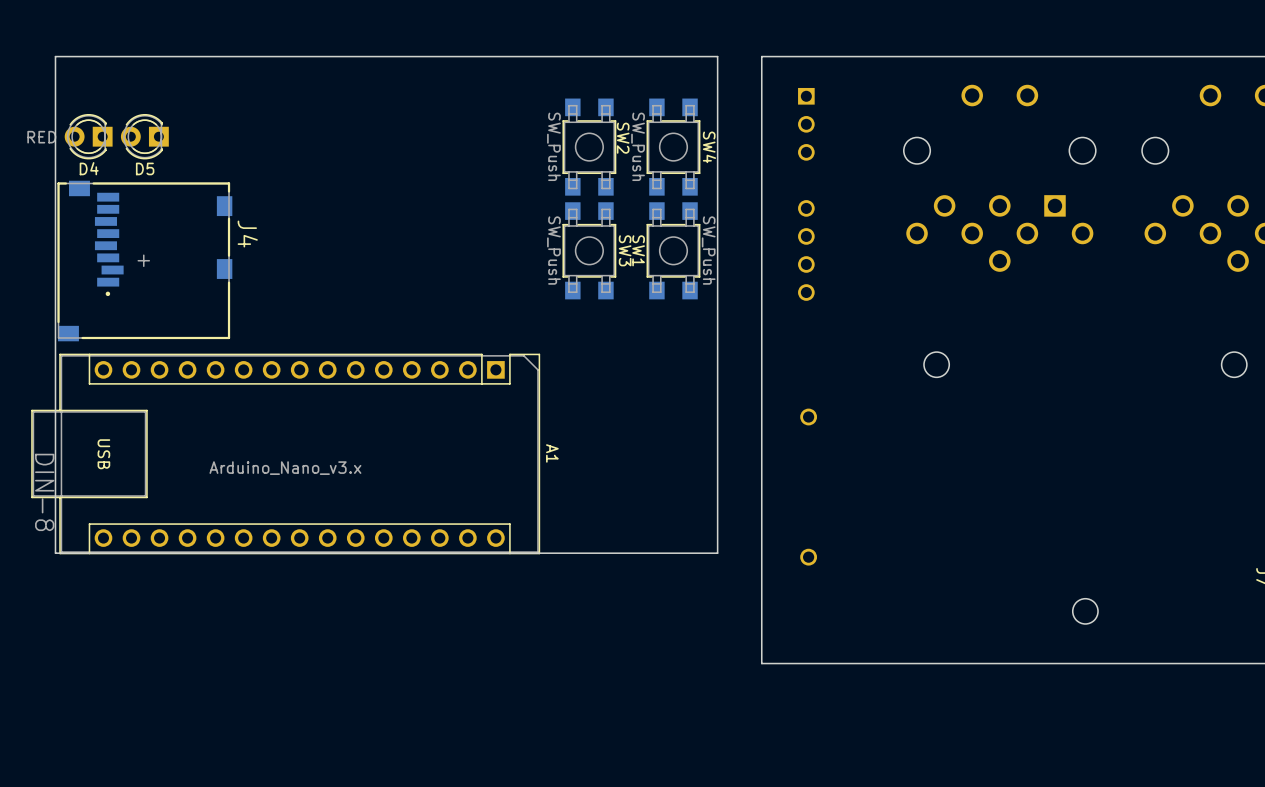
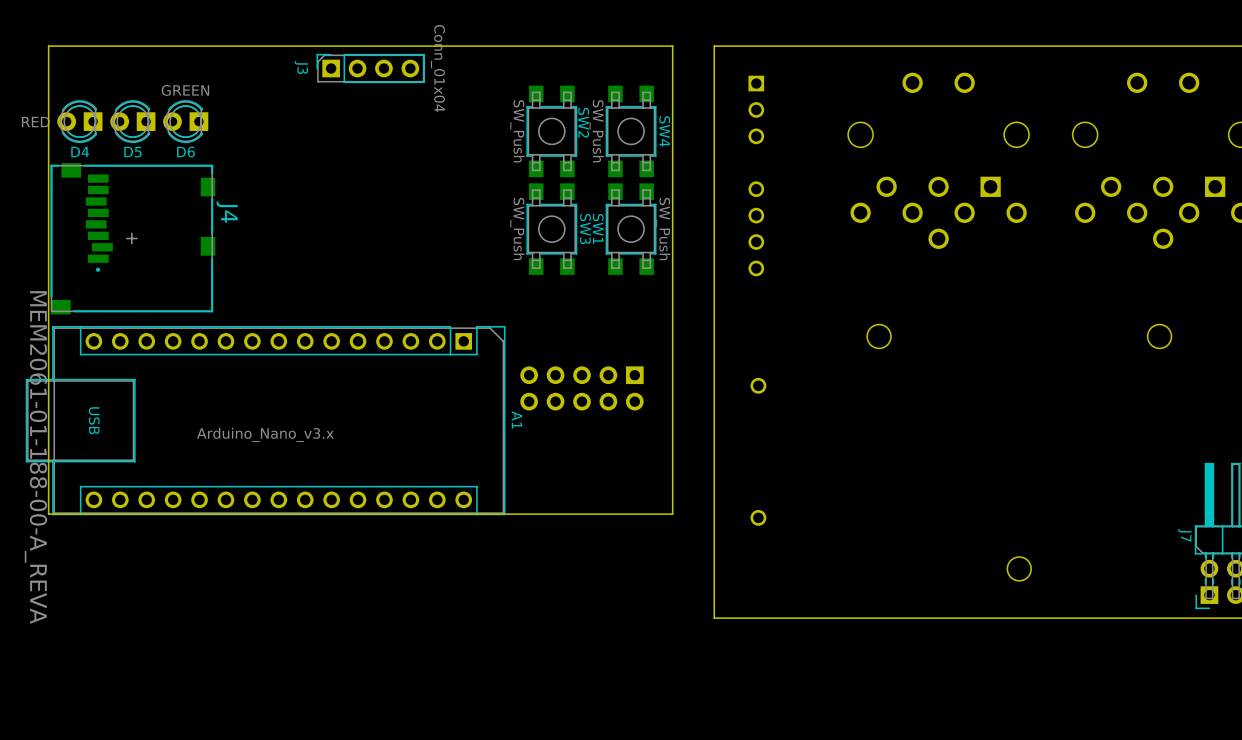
J3: none -> Conn_01x04 (370, 68)
D6: none -> GREEN (185, 121)
part: none -> (581, 388)
J4 value: DIN-8 (44, 492) -> MEM2061-01-188-00-A_REVA (35, 457)

